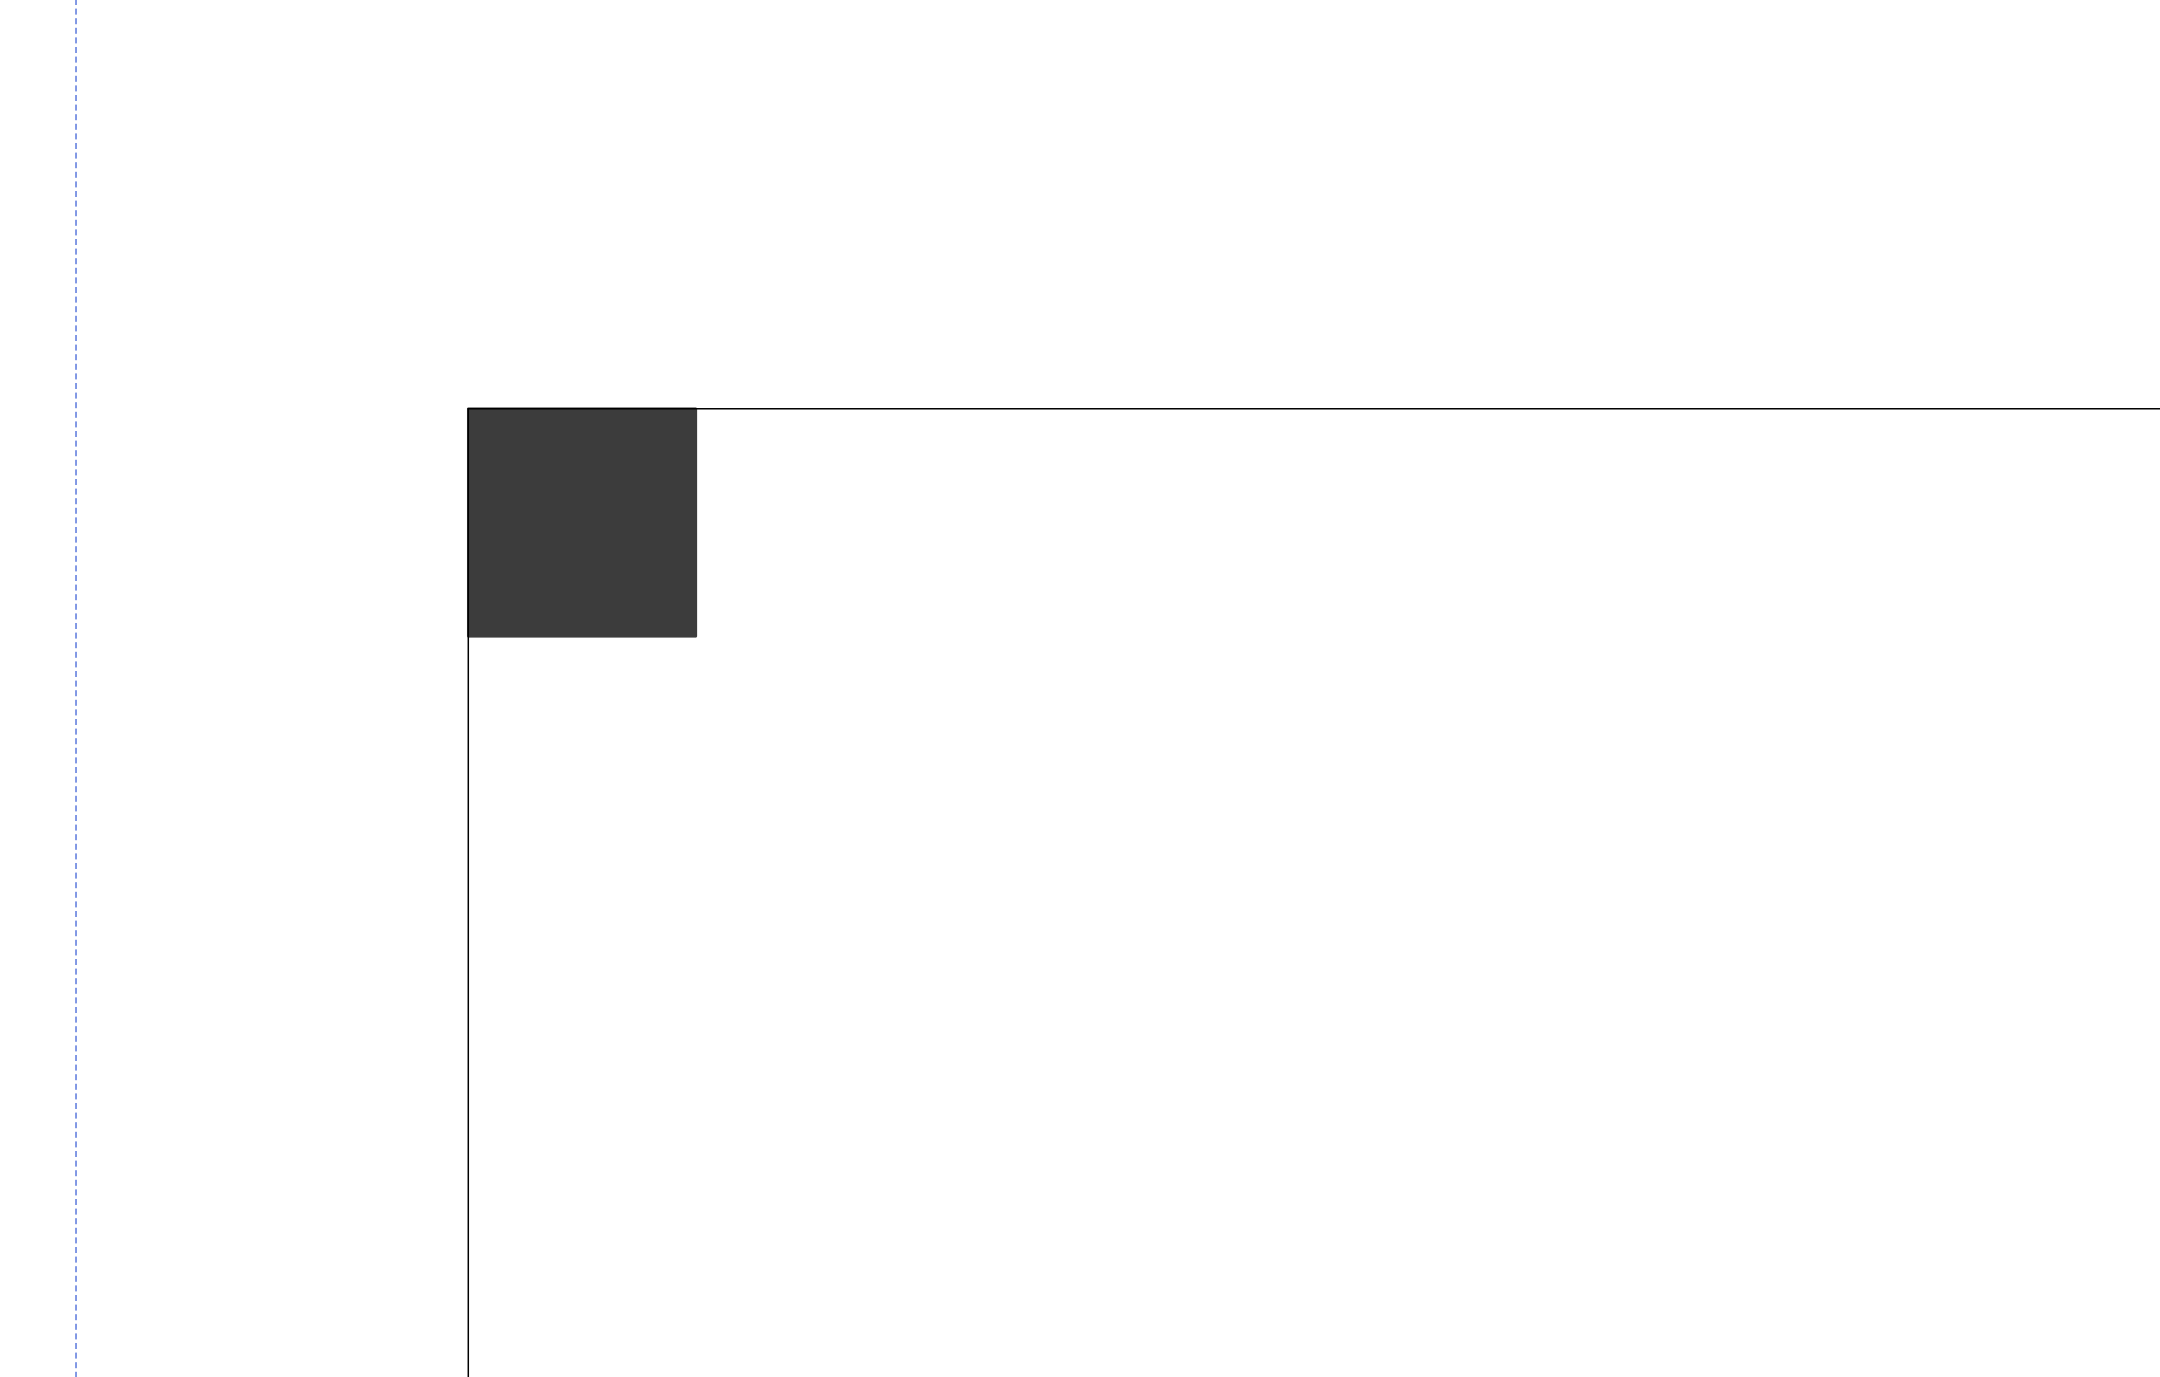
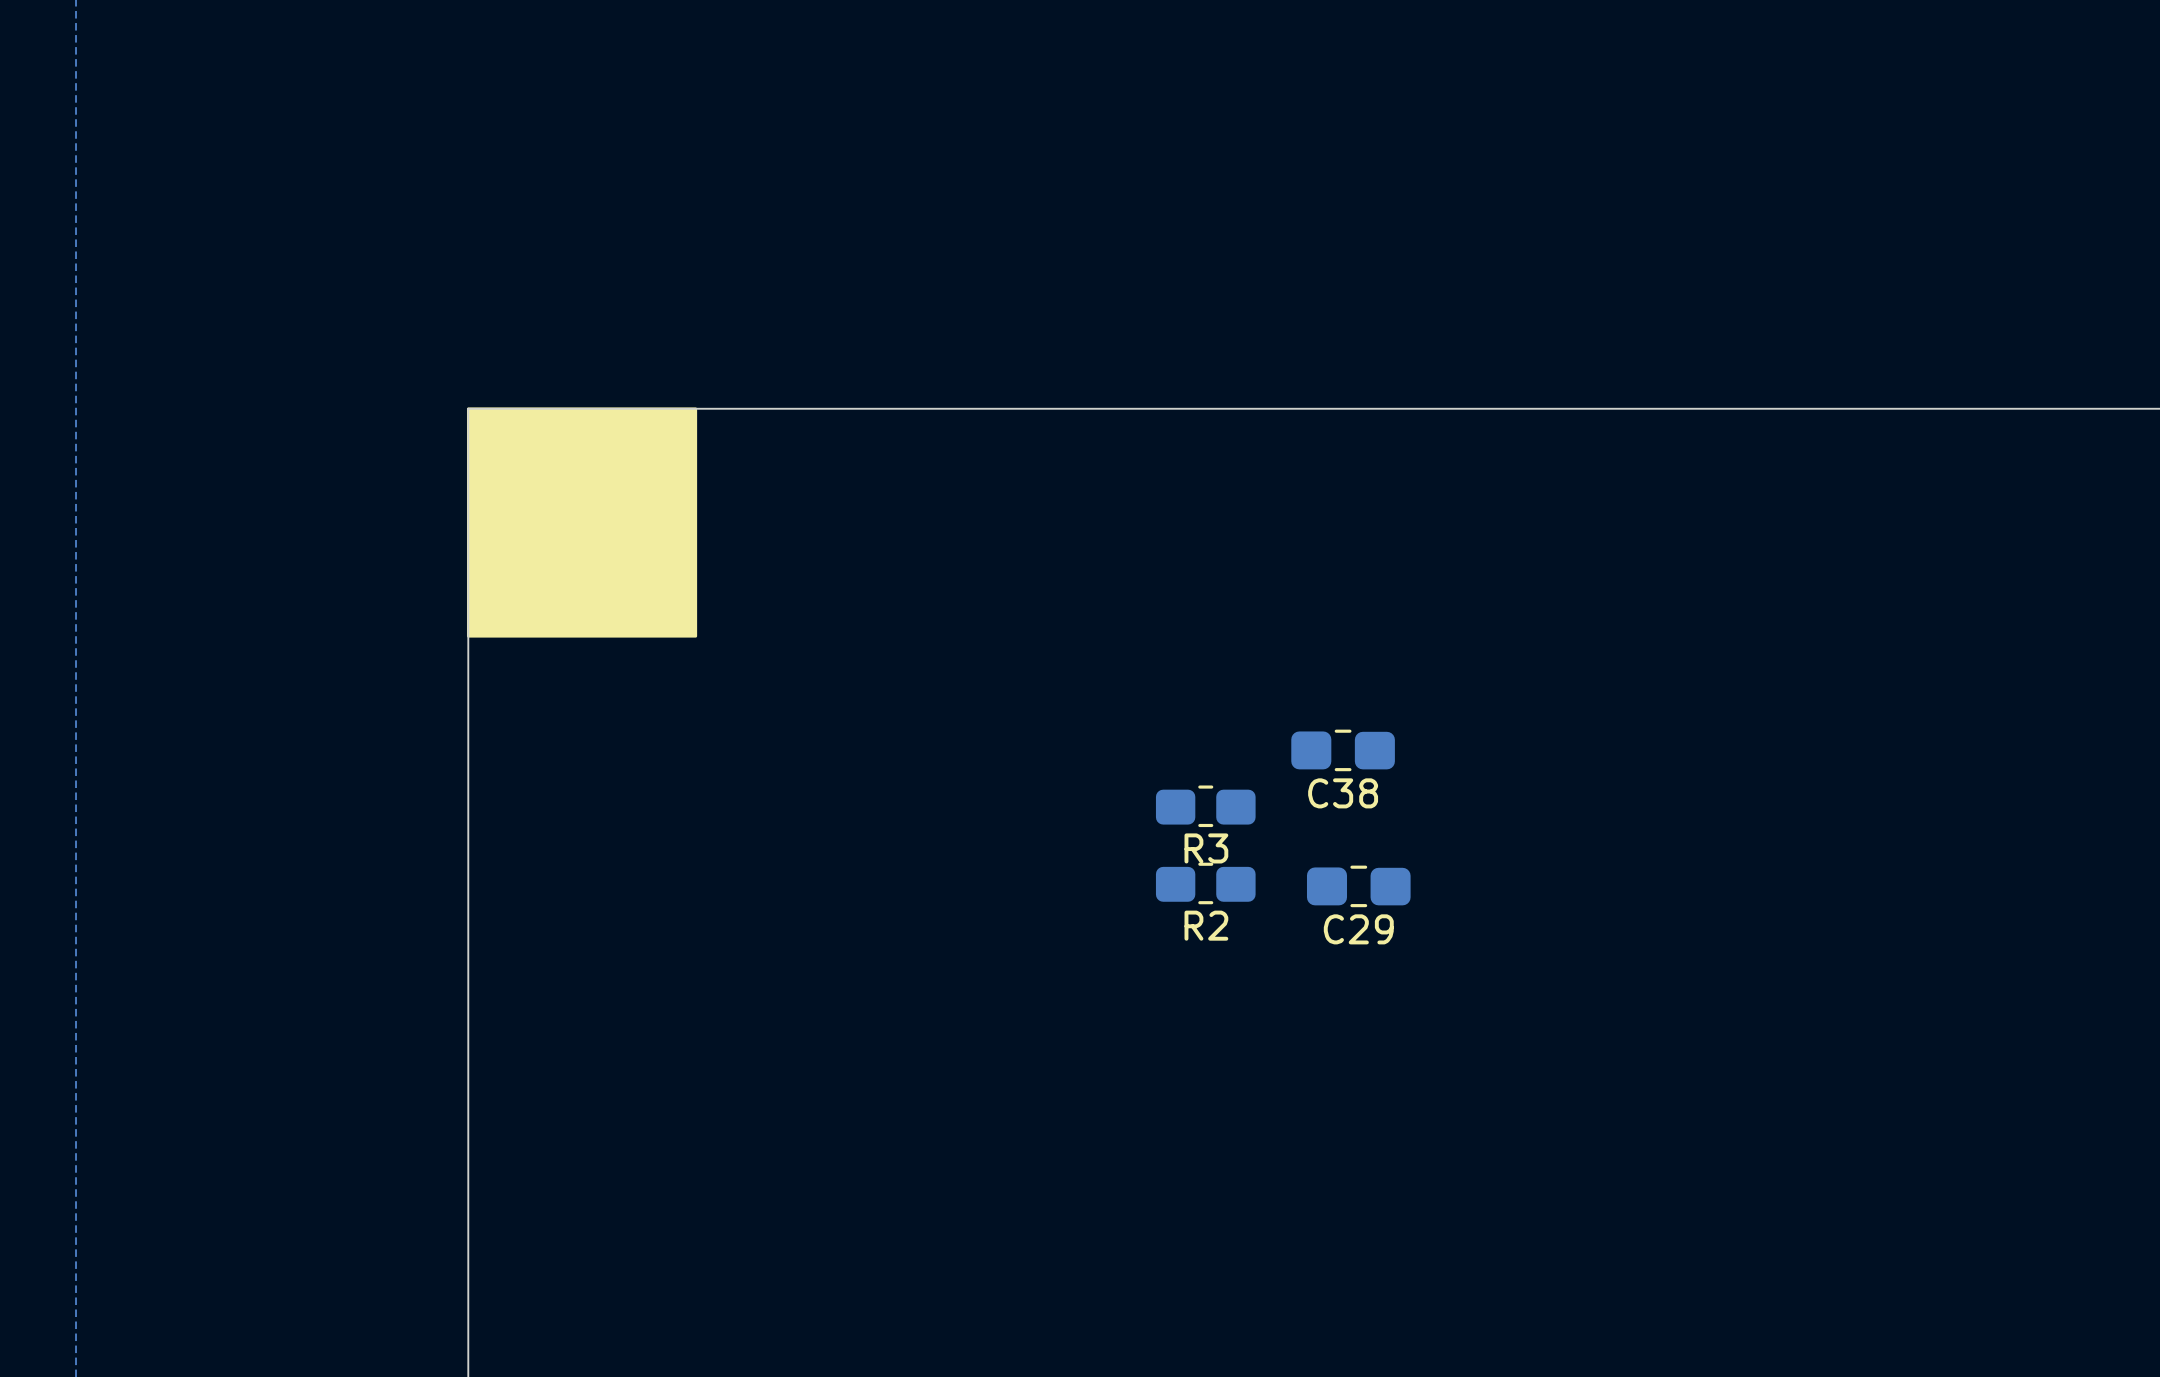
C38: none -> (1343, 750)
R3: none -> (1205, 806)
R2: none -> (1205, 883)
C29: none -> (1358, 886)

